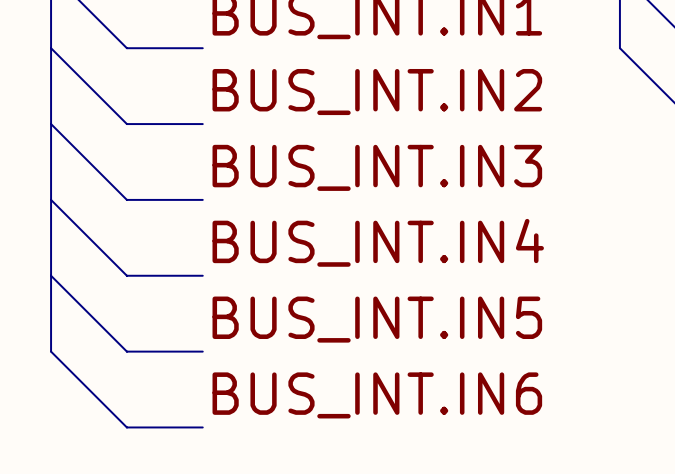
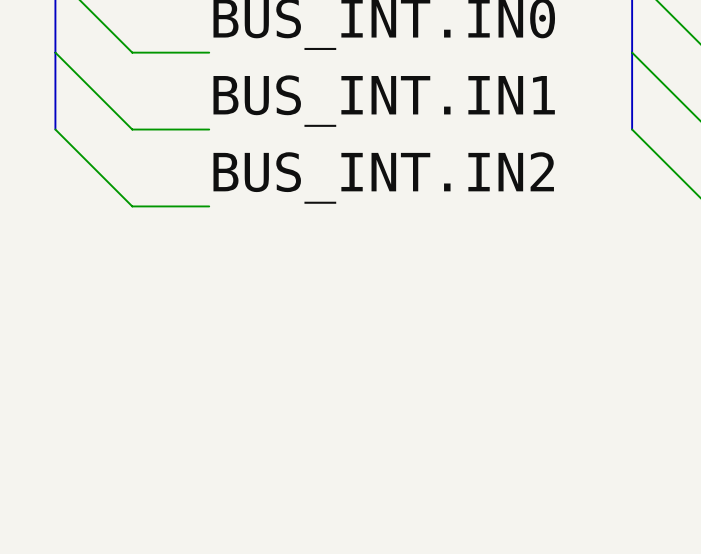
bus: (51, 48) (51, 351) -> none
wire: (51, 124) (126, 199) (202, 199) -> none
label: BUS_INT.IN3 (377, 167) -> none
wire: (51, 199) (126, 275) (202, 275) -> none
label: BUS_INT.IN4 (378, 242) -> none
wire: (51, 275) (126, 351) (202, 351) -> none
label: BUS_INT.IN5 (377, 319) -> none
wire: (51, 351) (126, 427) (202, 427) -> none
label: BUS_INT.IN6 (377, 395) -> none

